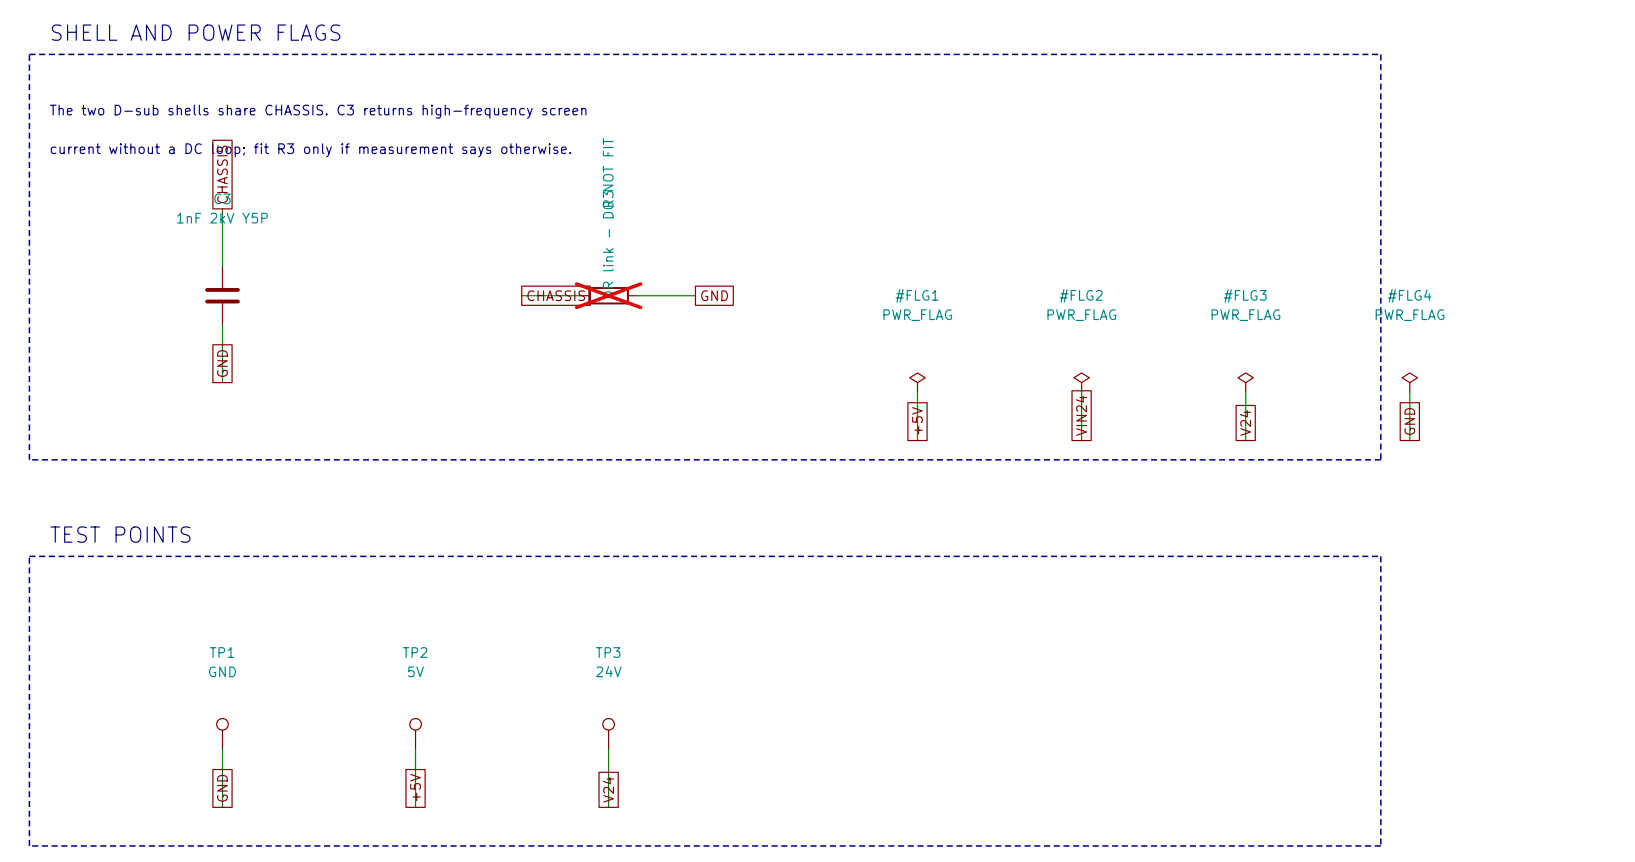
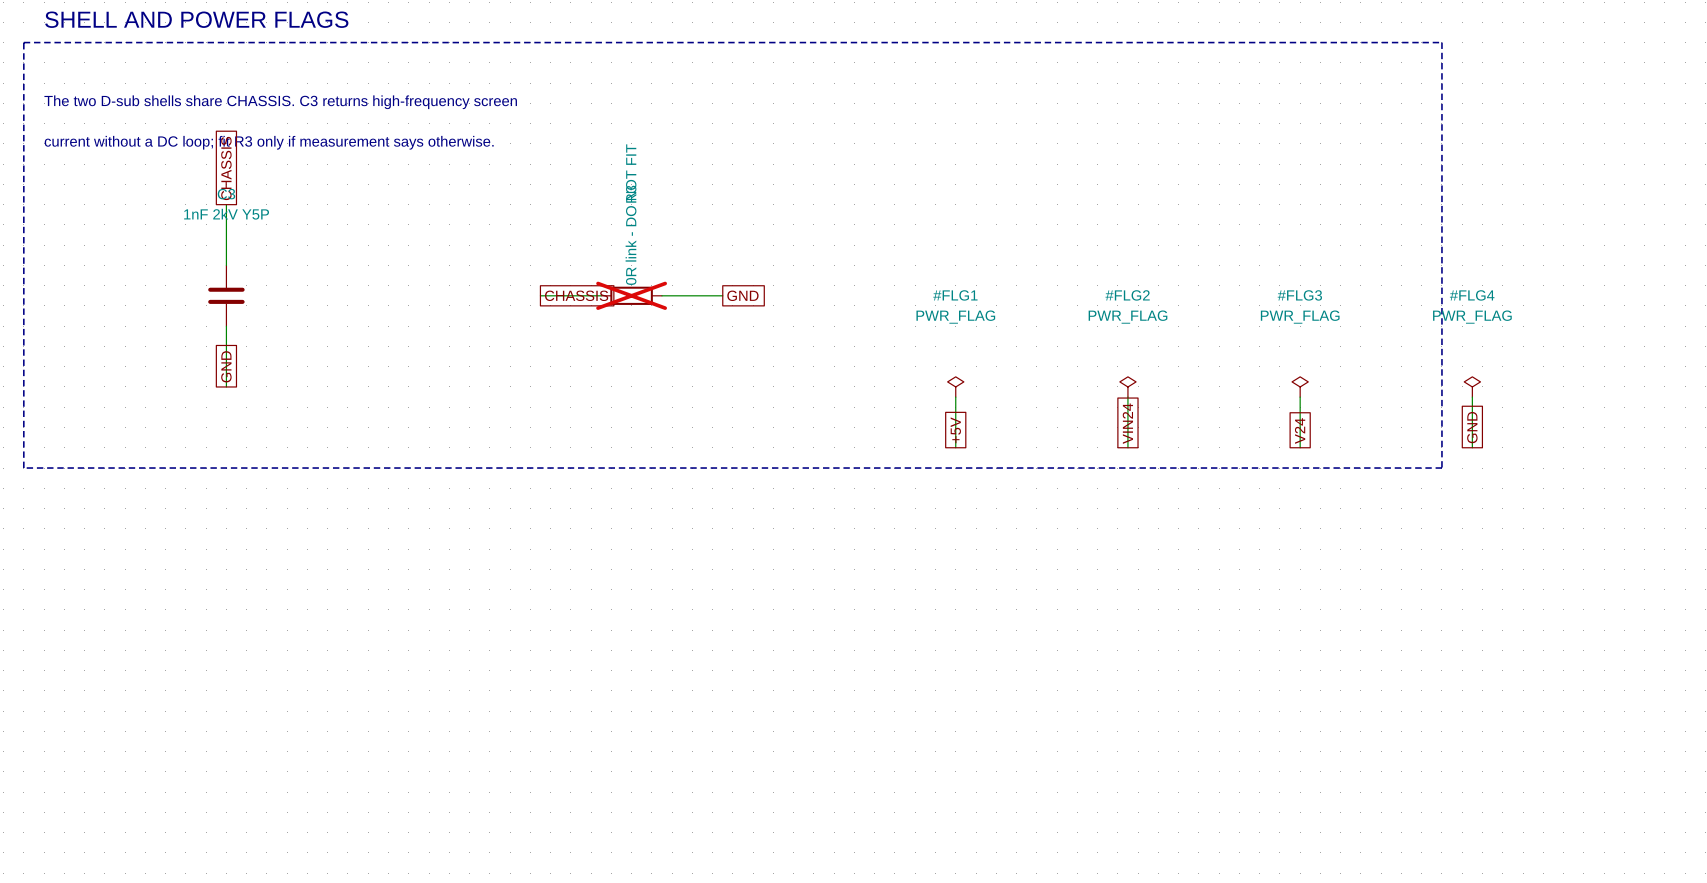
text: TEST POINTS (120, 534) -> none
line: (29, 556) (1380, 556) (1380, 845) (29, 845) (29, 556) -> none
TP1: GND (222, 733) -> none
TP2: 5V (415, 733) -> none
TP3: 24V (608, 733) -> none
wire: (222, 749) (222, 807) -> none
wire: (415, 749) (415, 807) -> none
wire: (608, 749) (608, 807) -> none
global label: +5V (415, 787) -> none
global label: GND (222, 788) -> none
global label: V24 (608, 789) -> none

